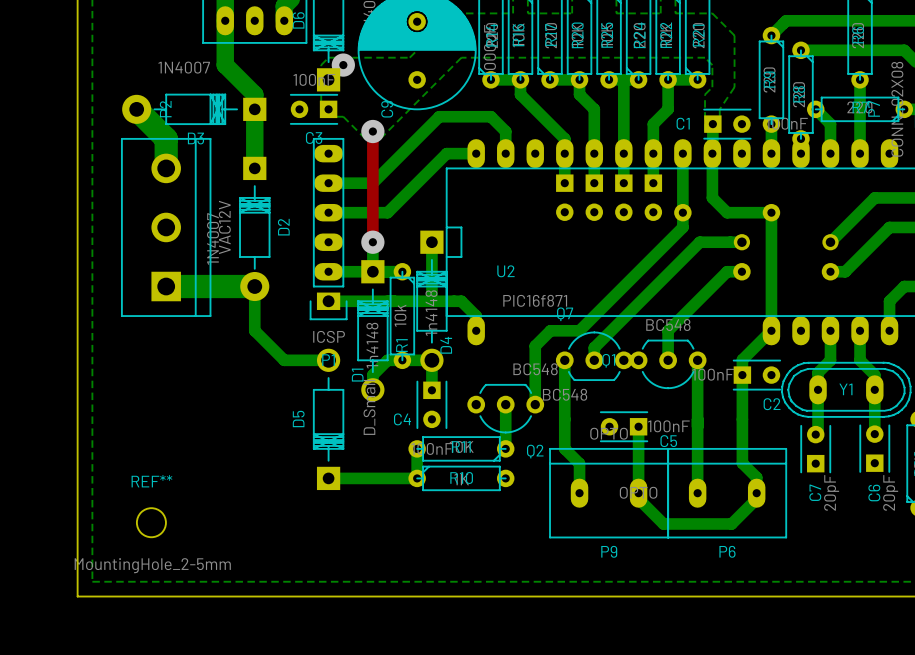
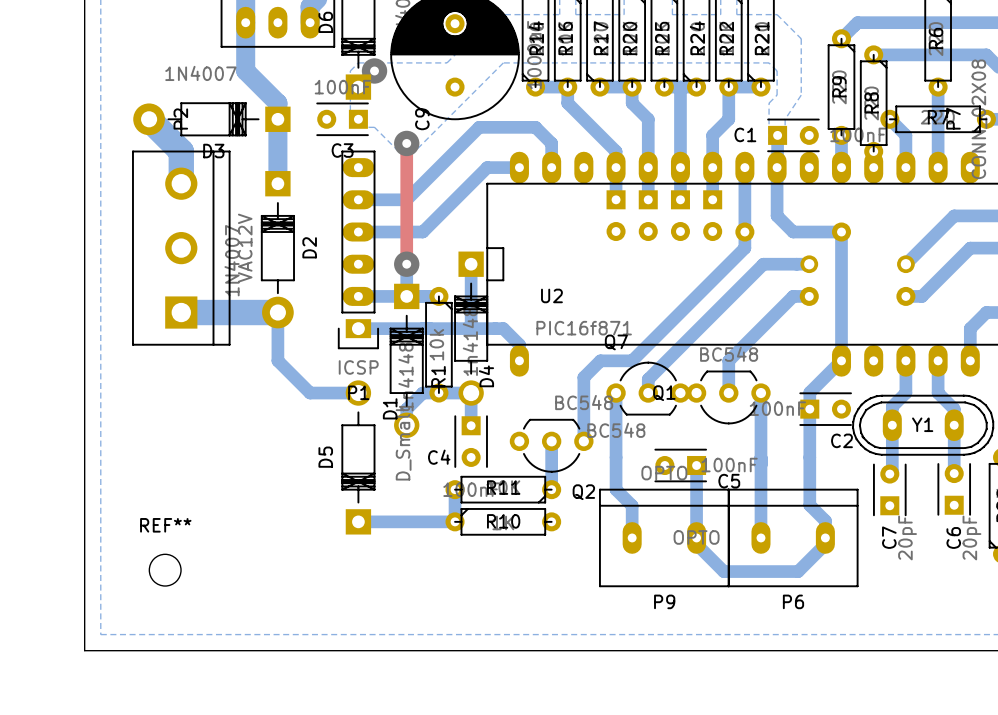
REF** value: MountingHole_2-5mm (152, 565) -> none

